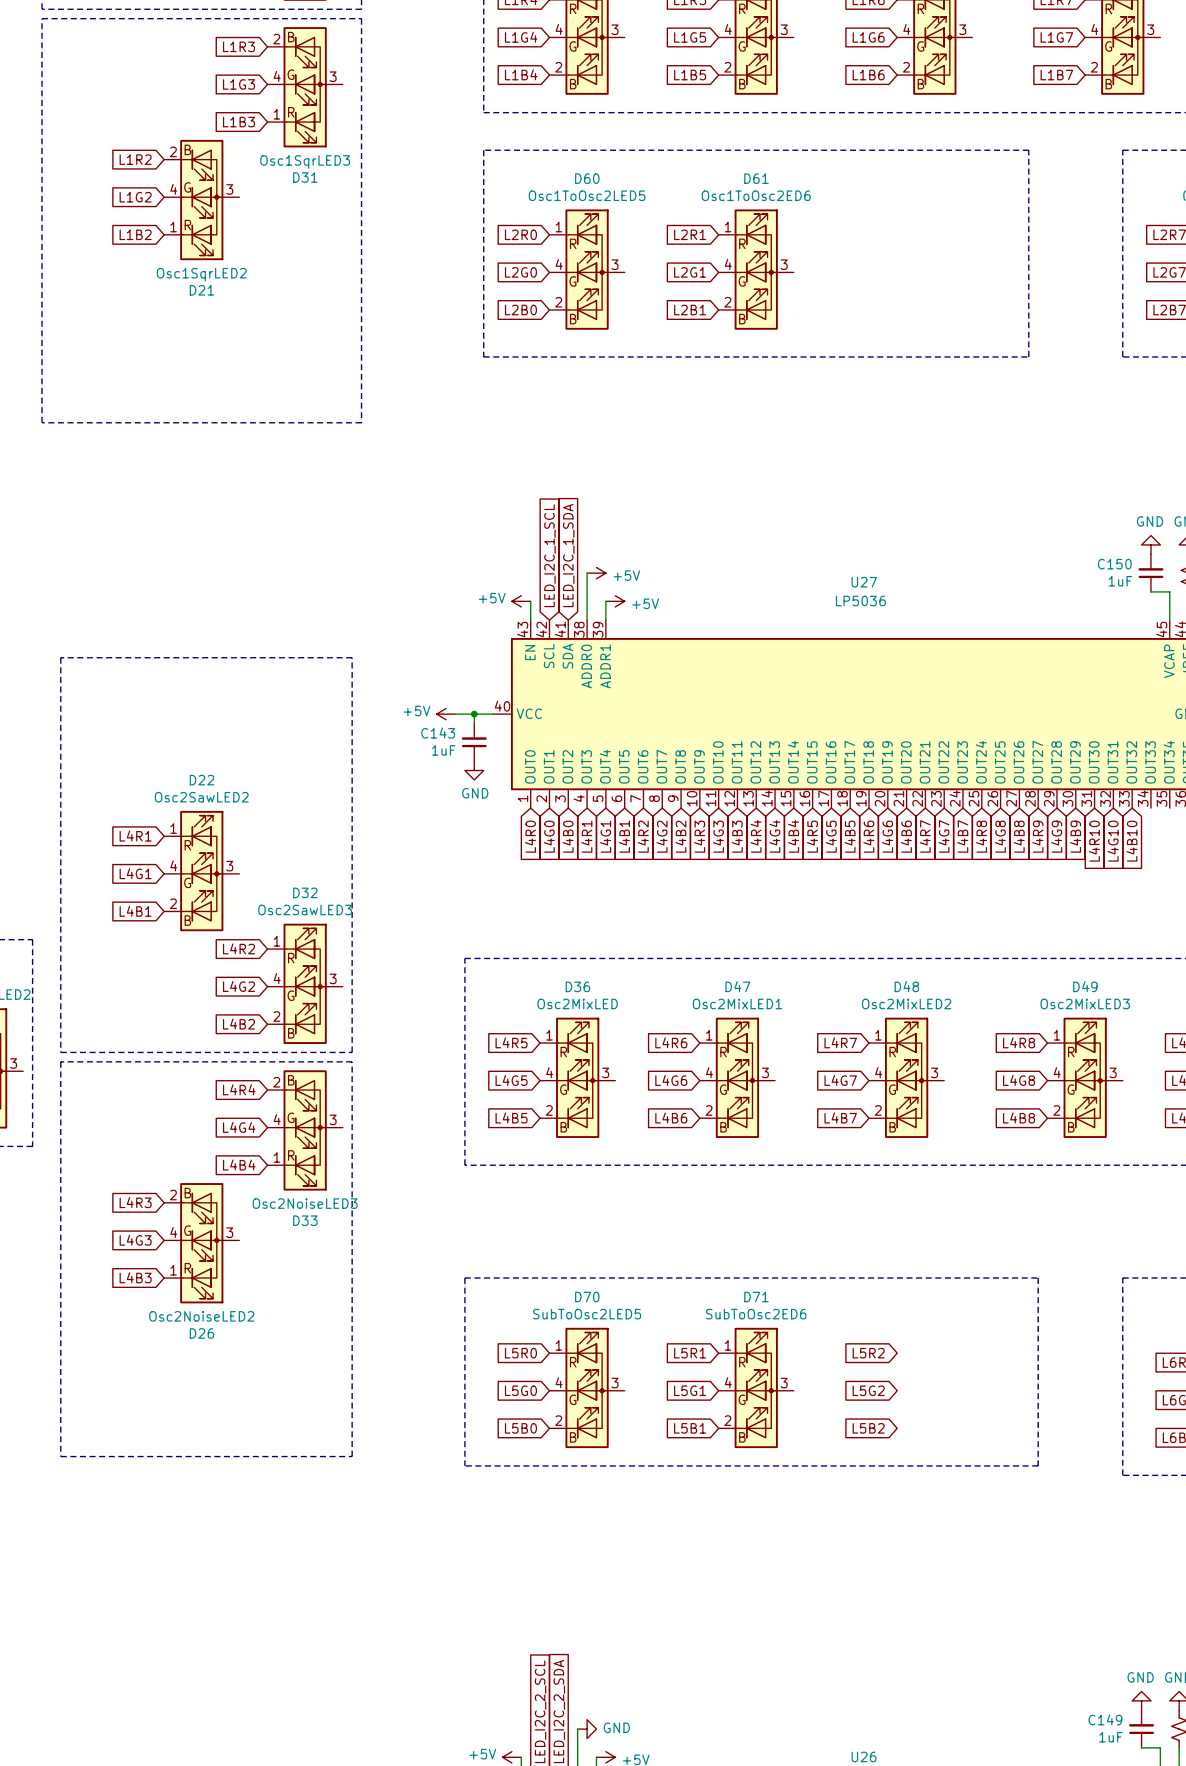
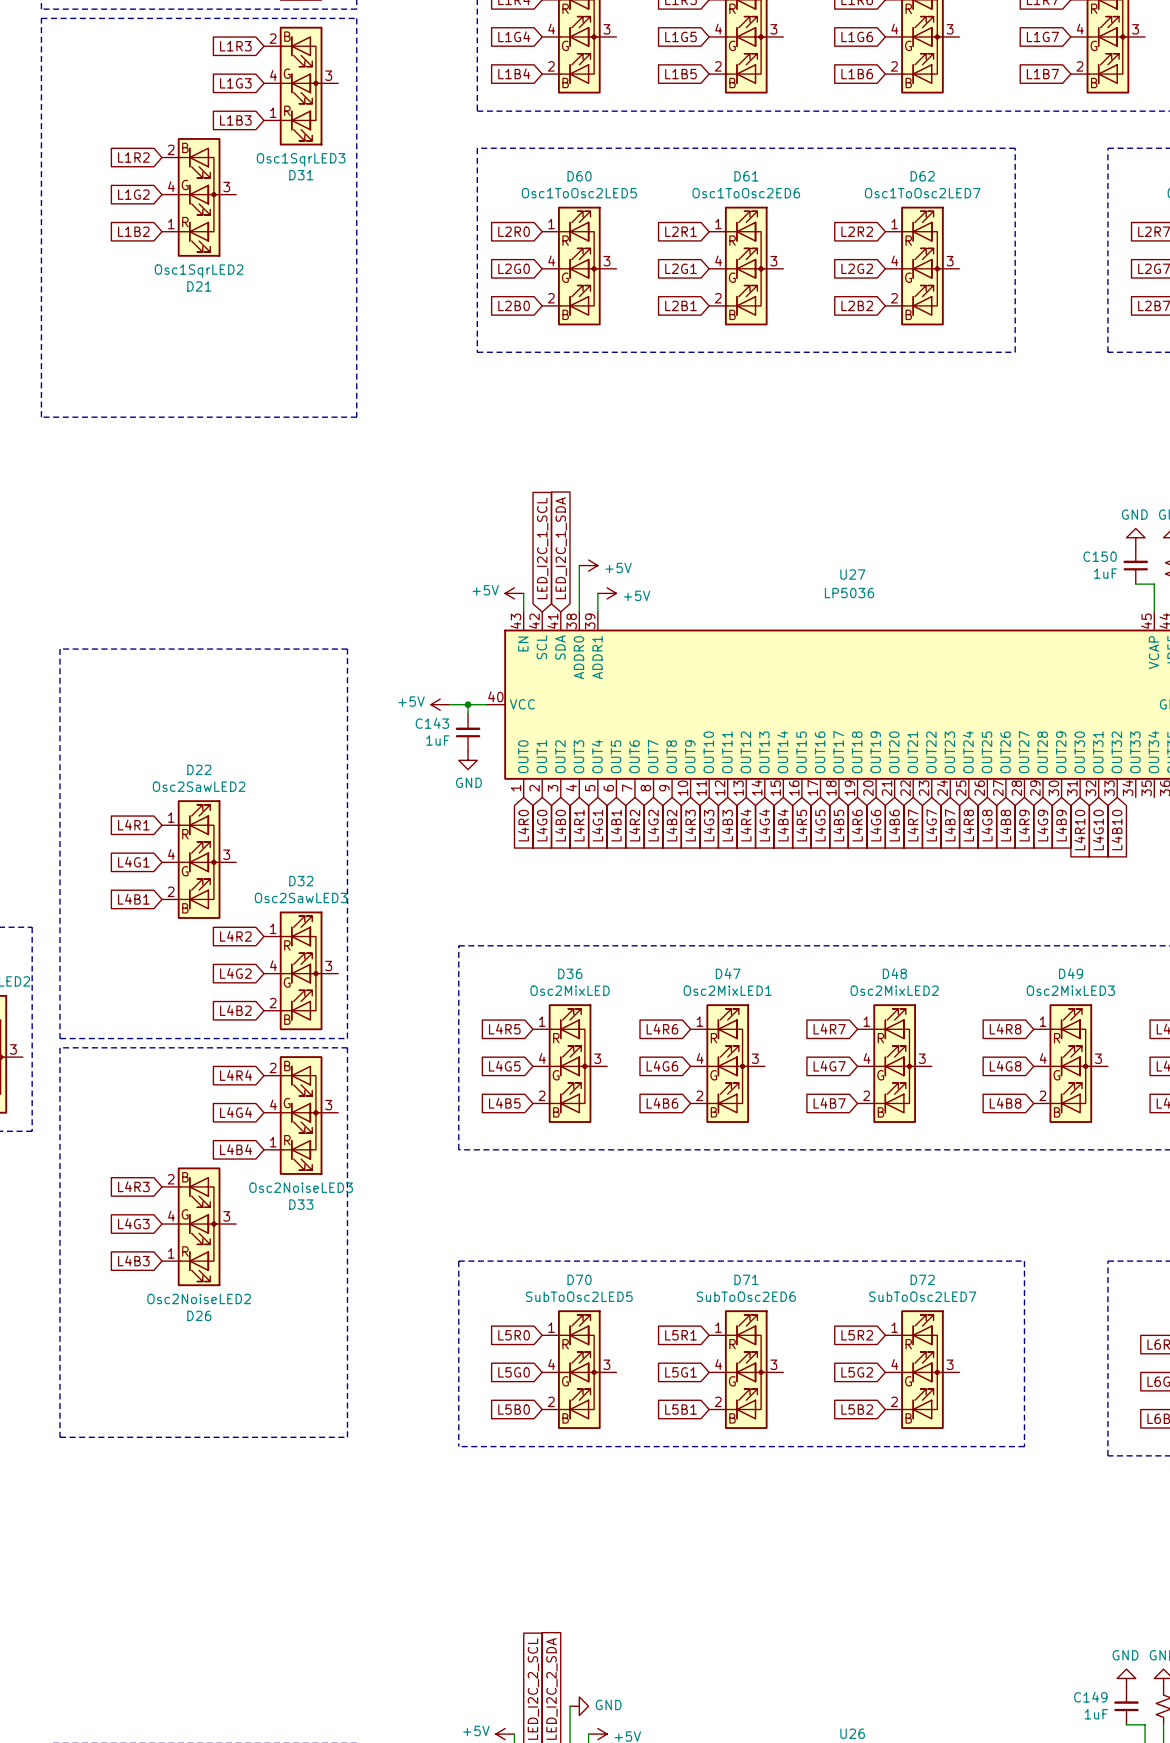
global label: none -> L2R2 (857, 231)
D62: none -> Osc1ToOsc2LED7 (922, 266)
global label: none -> L2G2 (857, 268)
global label: none -> L2B2 (857, 305)
D72: none -> SubToOsc2LED7 (922, 1369)

